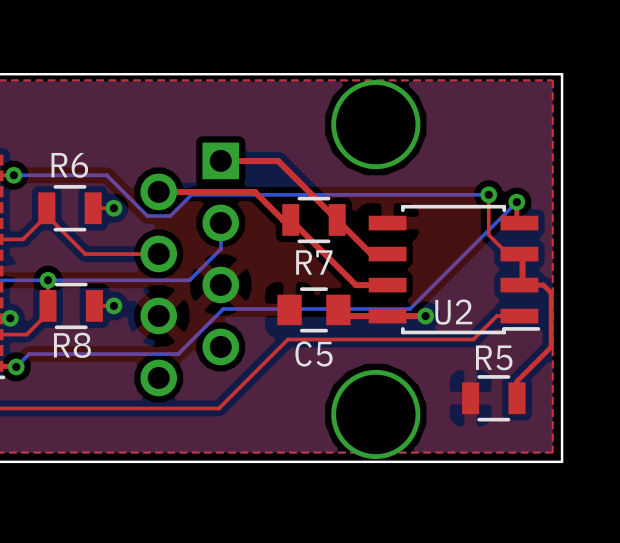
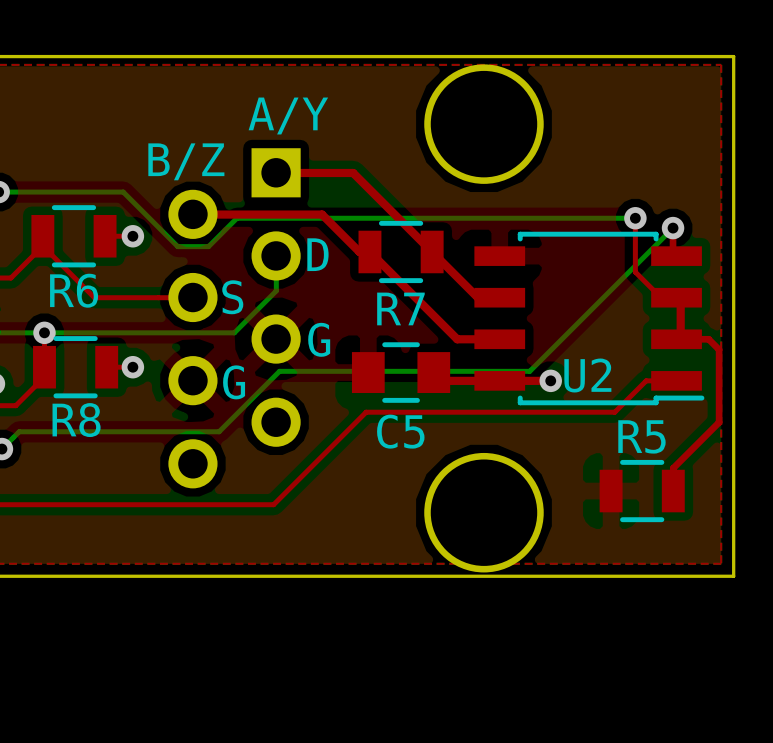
text: none -> A/Y (288, 116)
text: none -> B/Z (186, 161)
R6 name position: R6 (69, 165) -> R6 (74, 290)
text: none -> D (317, 254)
text: none -> S (232, 297)
text: none -> G (319, 339)
text: none -> G (234, 382)

